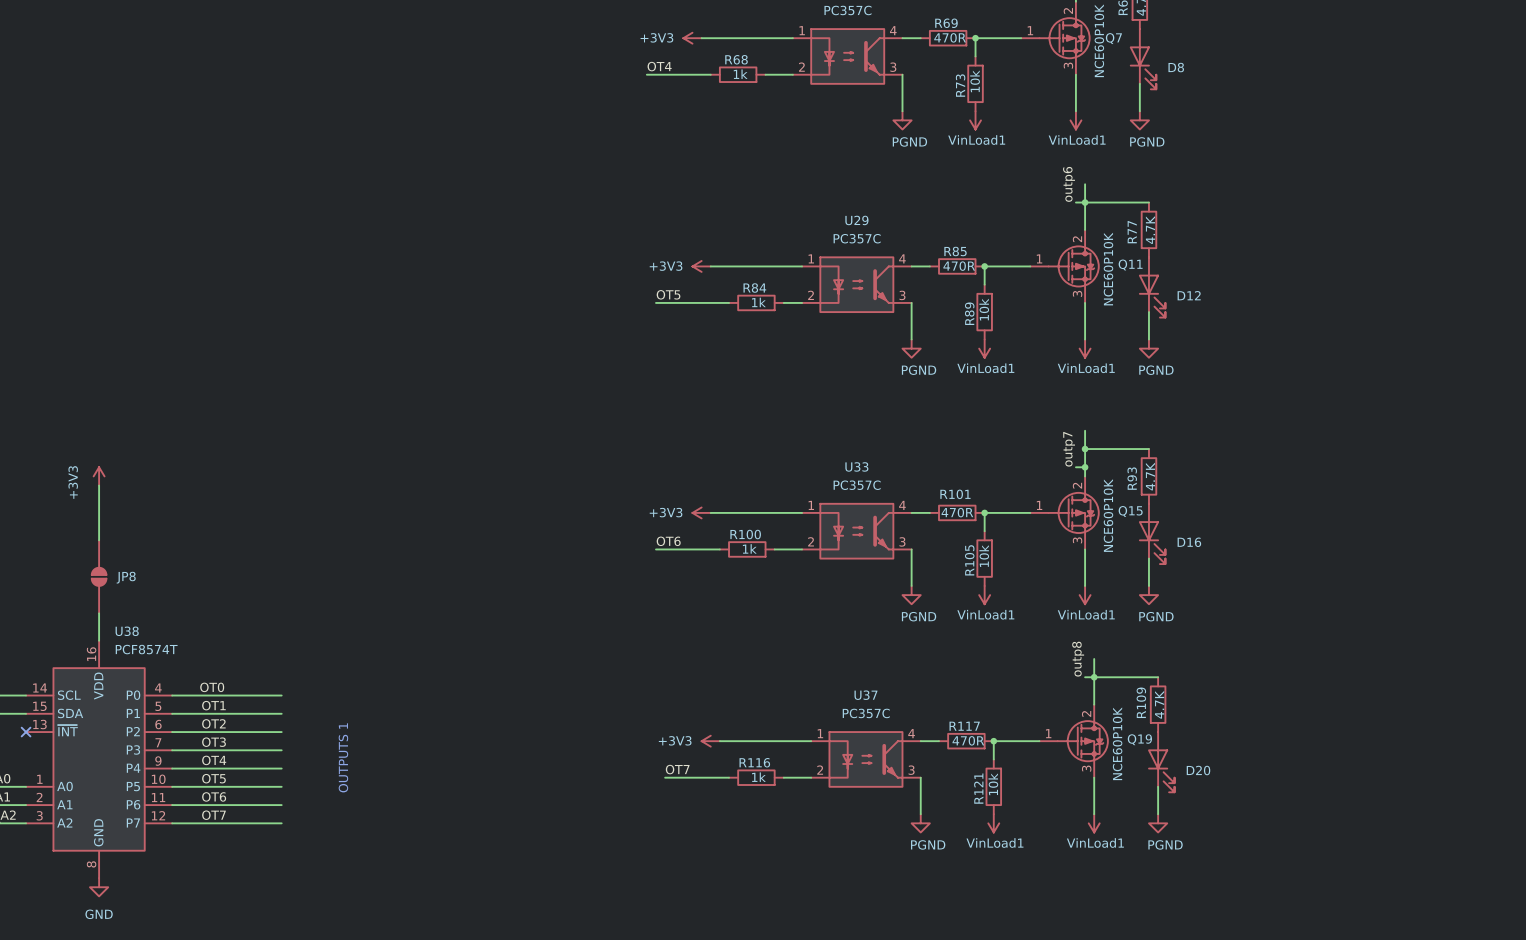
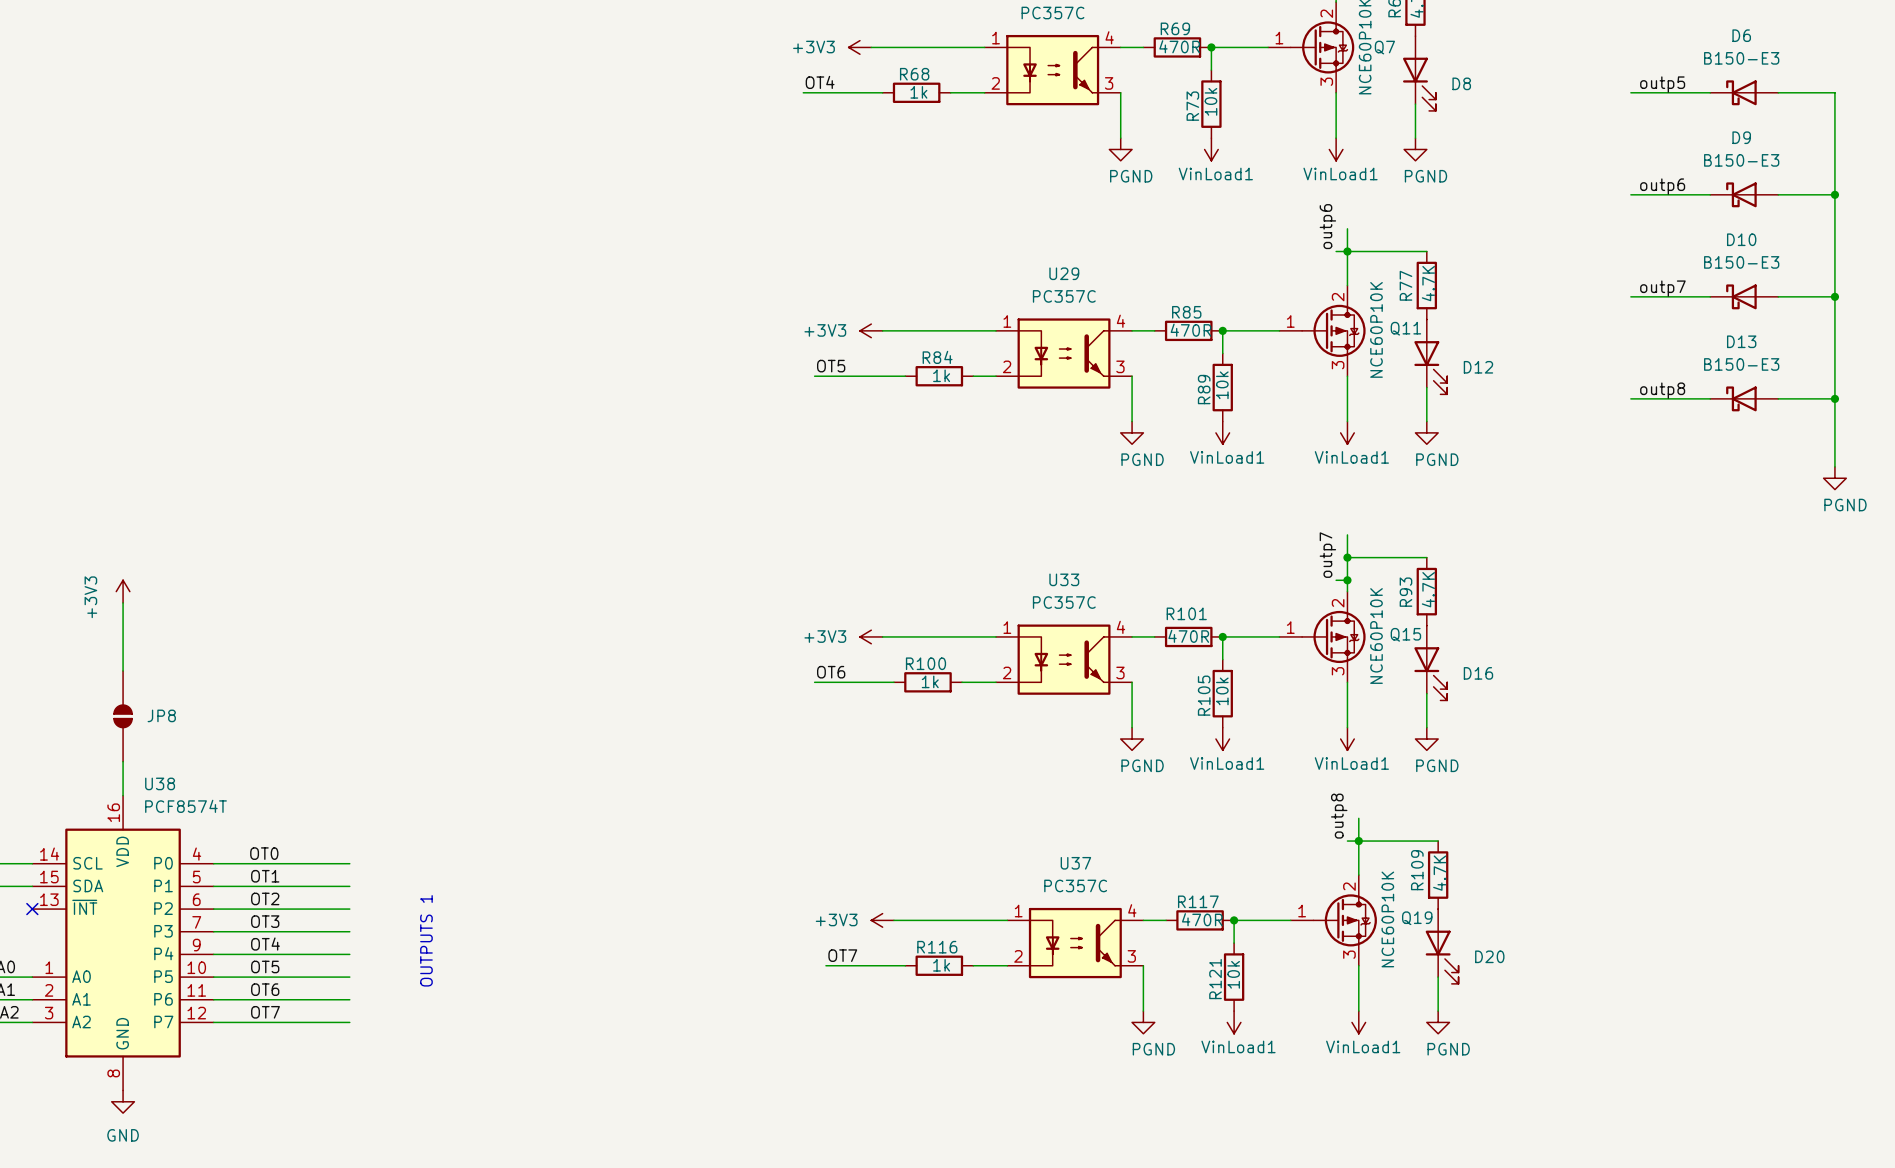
label: none -> outp5 (1662, 84)
wire: none -> (1630, 92) (1710, 92)
D6: none -> B150-E3 (1744, 92)
wire: none -> (1778, 92) (1834, 92) (1834, 466)
label: none -> outp6 (1662, 186)
wire: none -> (1630, 194) (1710, 194)
D9: none -> B150-E3 (1744, 194)
wire: none -> (1778, 194) (1834, 194)
junction: none -> (1834, 194)
label: none -> outp7 (1662, 288)
wire: none -> (1630, 296) (1710, 296)
D10: none -> B150-E3 (1744, 296)
wire: none -> (1778, 296) (1834, 296)
junction: none -> (1834, 296)
label: none -> outp8 (1662, 390)
wire: none -> (1630, 398) (1710, 398)
D13: none -> B150-E3 (1744, 398)
wire: none -> (1778, 398) (1834, 398)
junction: none -> (1834, 398)
power symbol: none -> PGND (1834, 478)

